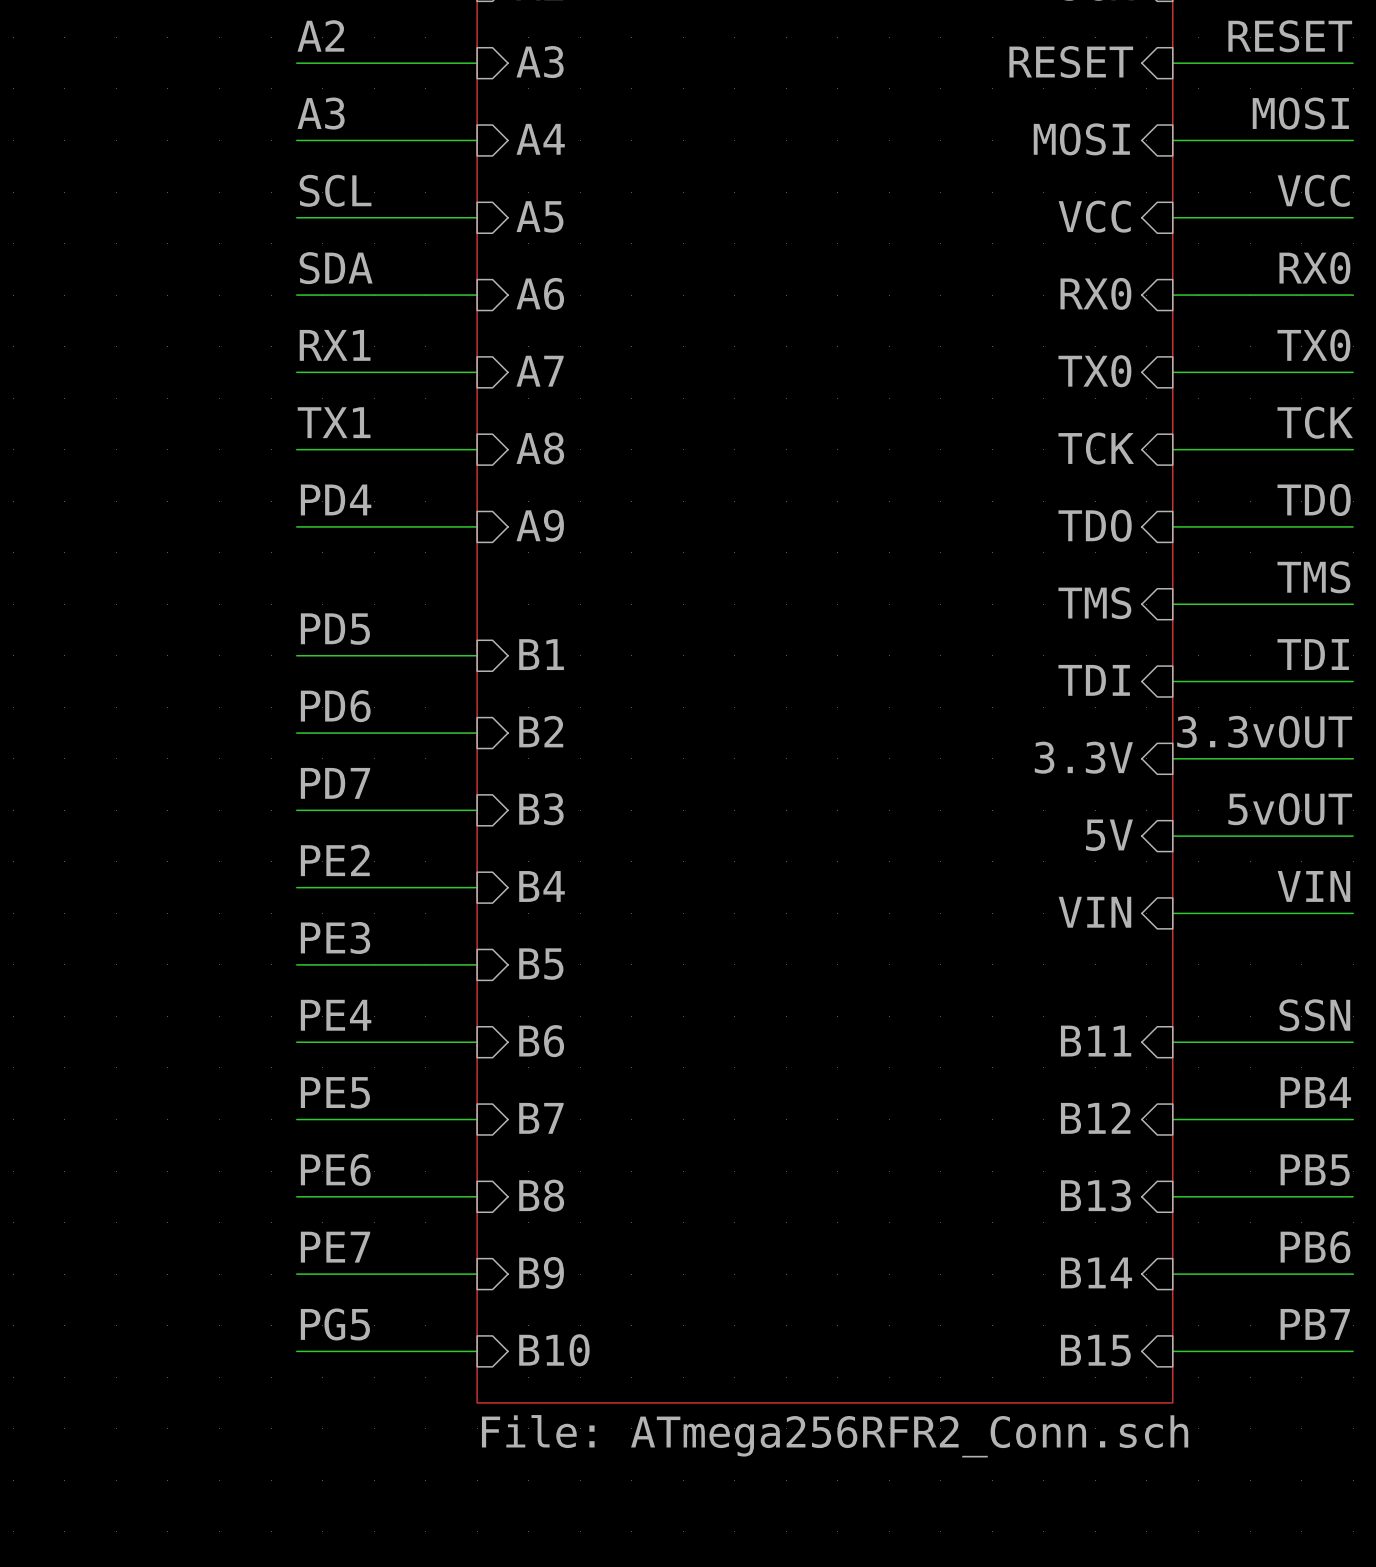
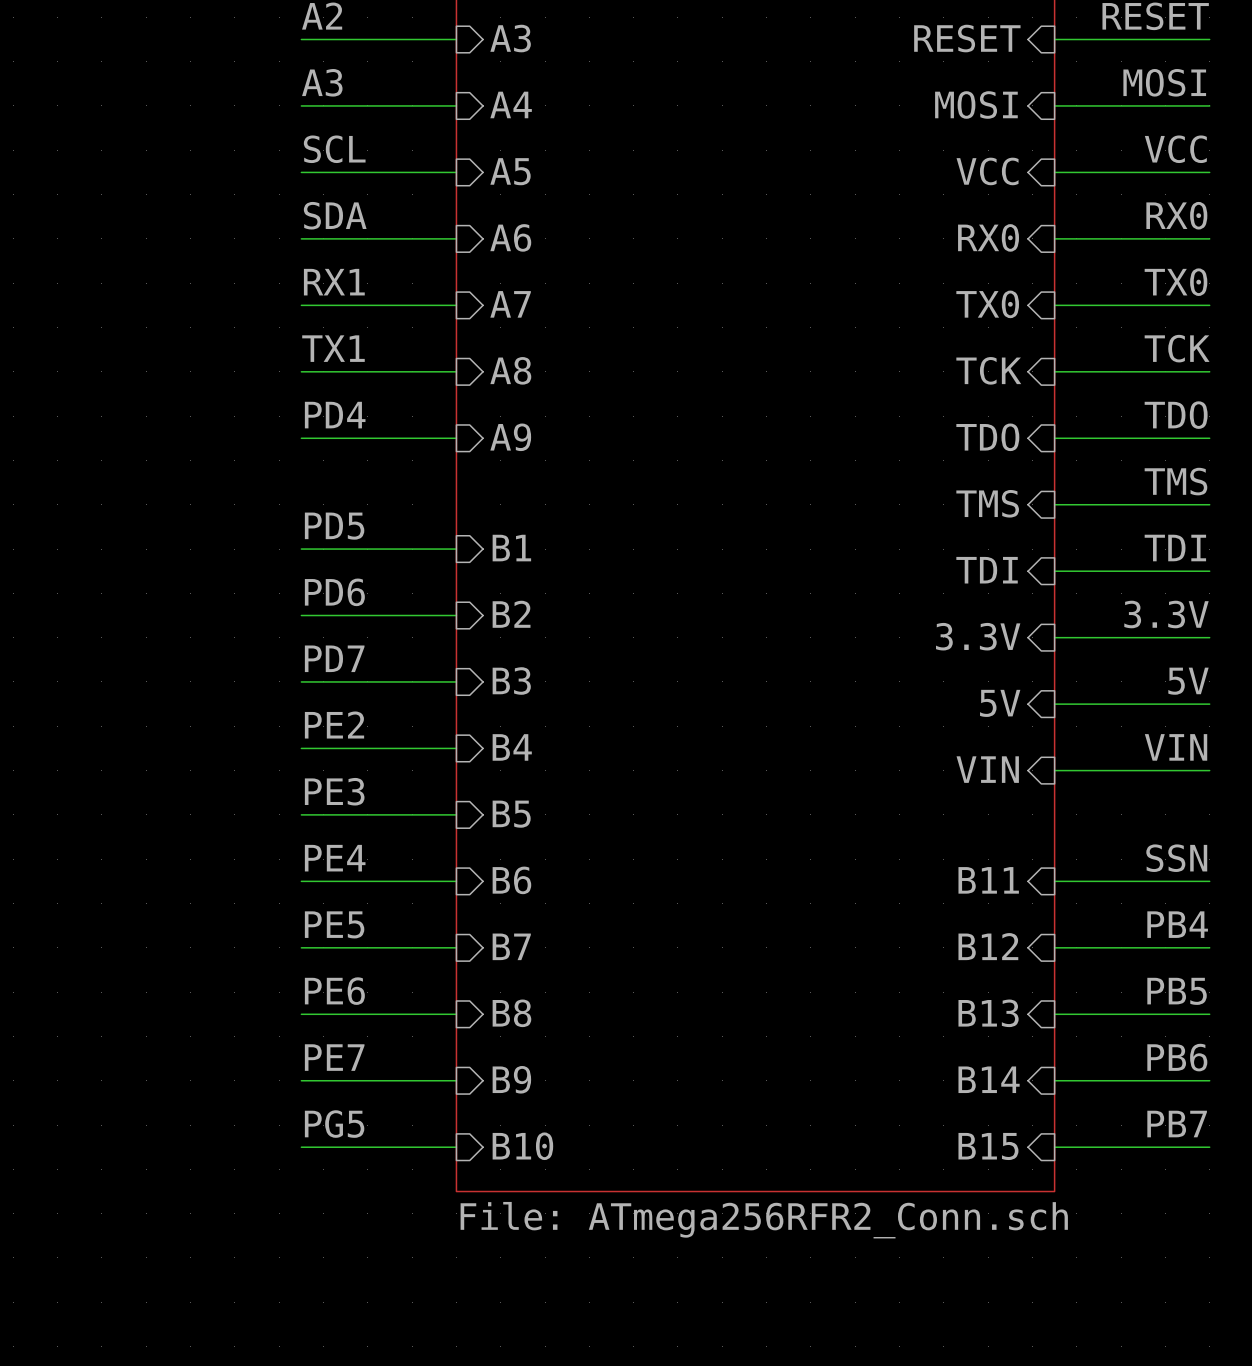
label: 3.3vOUT (1264, 731) -> 3.3V (1166, 614)
label: 5vOUT (1290, 809) -> 5V (1188, 681)

